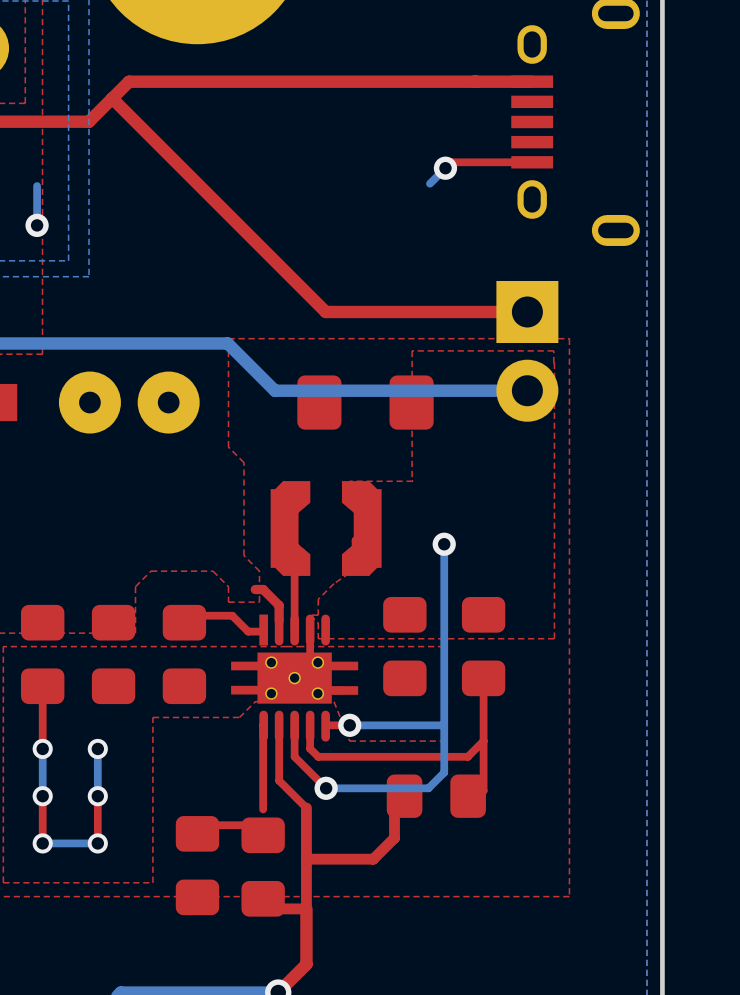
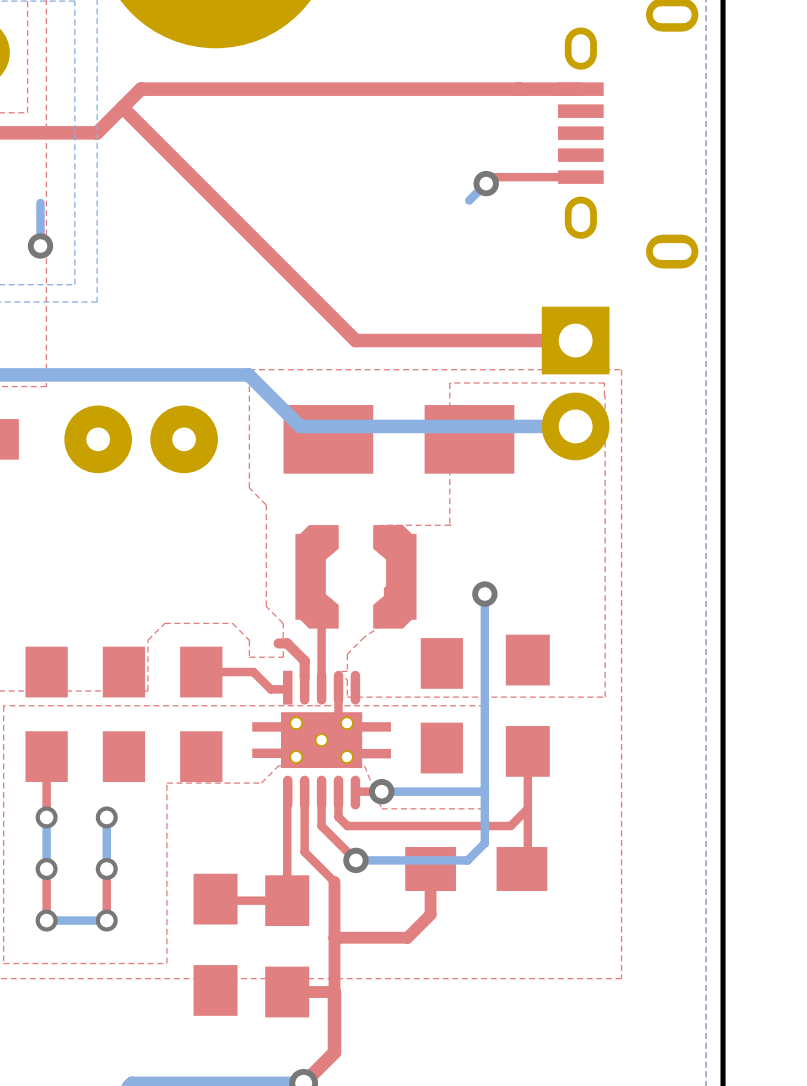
part footprint: [297, 375, 434, 430] -> [283, 405, 515, 474]
part footprint: [383, 597, 427, 697] -> [420, 638, 464, 774]
part footprint: [461, 597, 506, 697] -> [505, 634, 550, 777]
part footprint: [21, 604, 65, 705] -> [25, 646, 68, 782]
part footprint: [91, 604, 136, 705] -> [102, 646, 146, 782]
part footprint: [162, 604, 207, 705] -> [180, 646, 223, 782]
part footprint: [386, 774, 486, 818] -> [405, 847, 548, 891]
part footprint: [175, 816, 220, 916] -> [193, 873, 238, 1016]
part footprint: [241, 817, 285, 917] -> [265, 875, 310, 1018]

